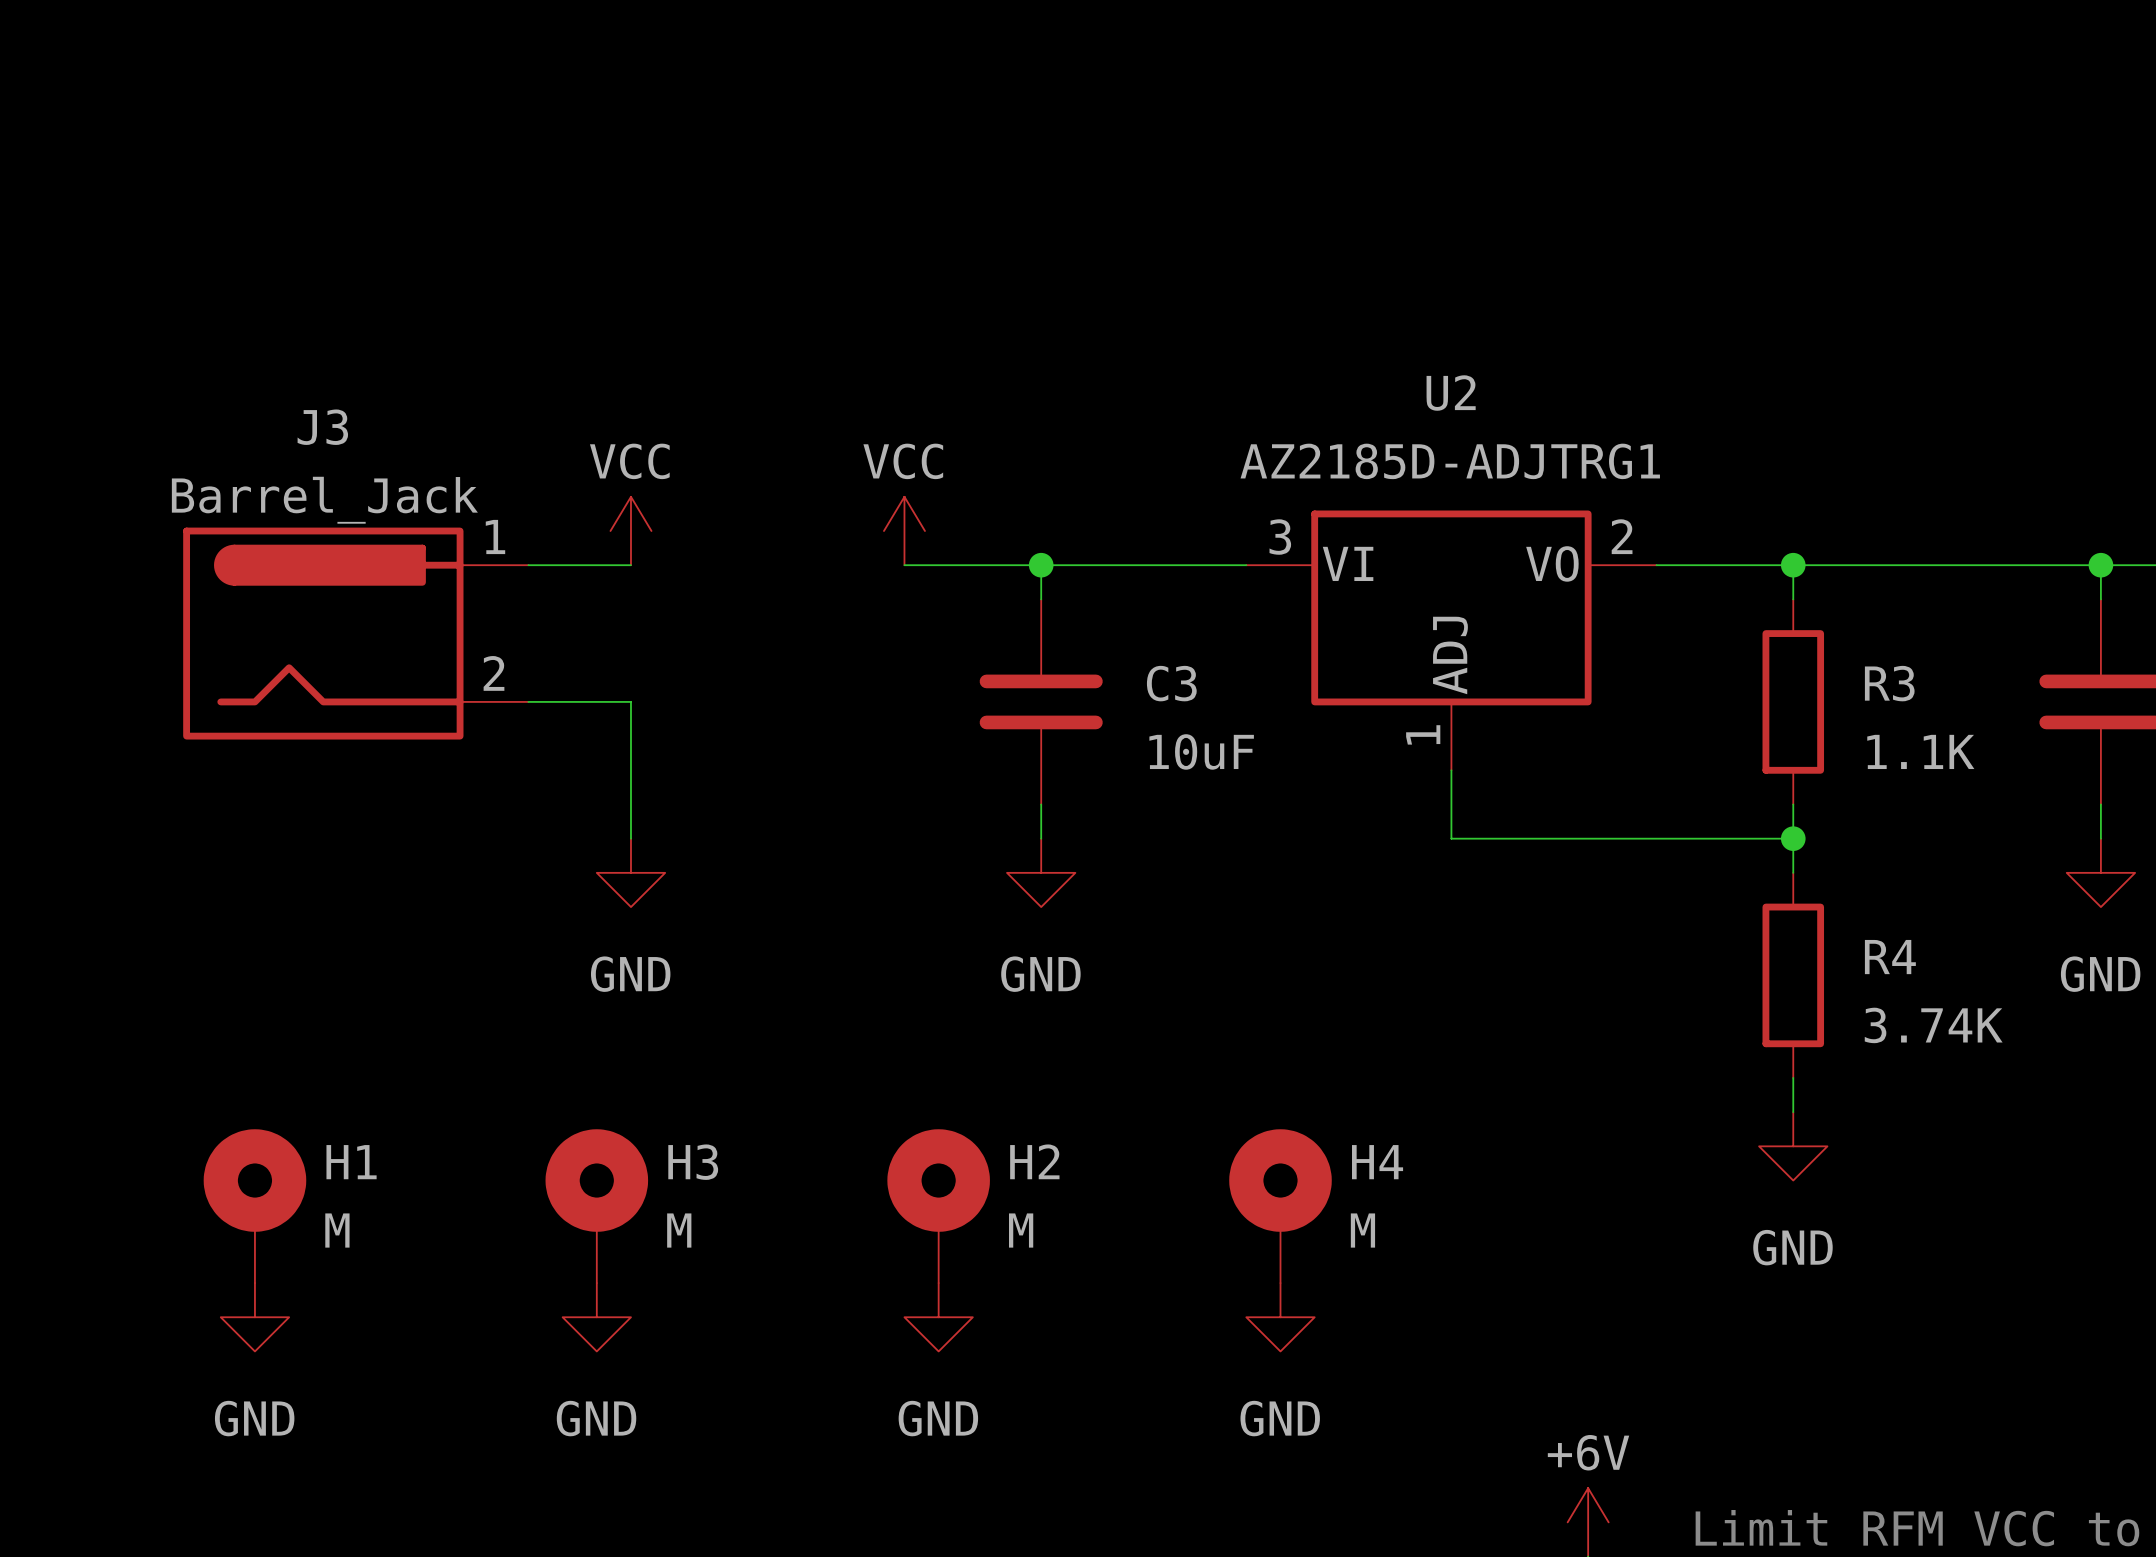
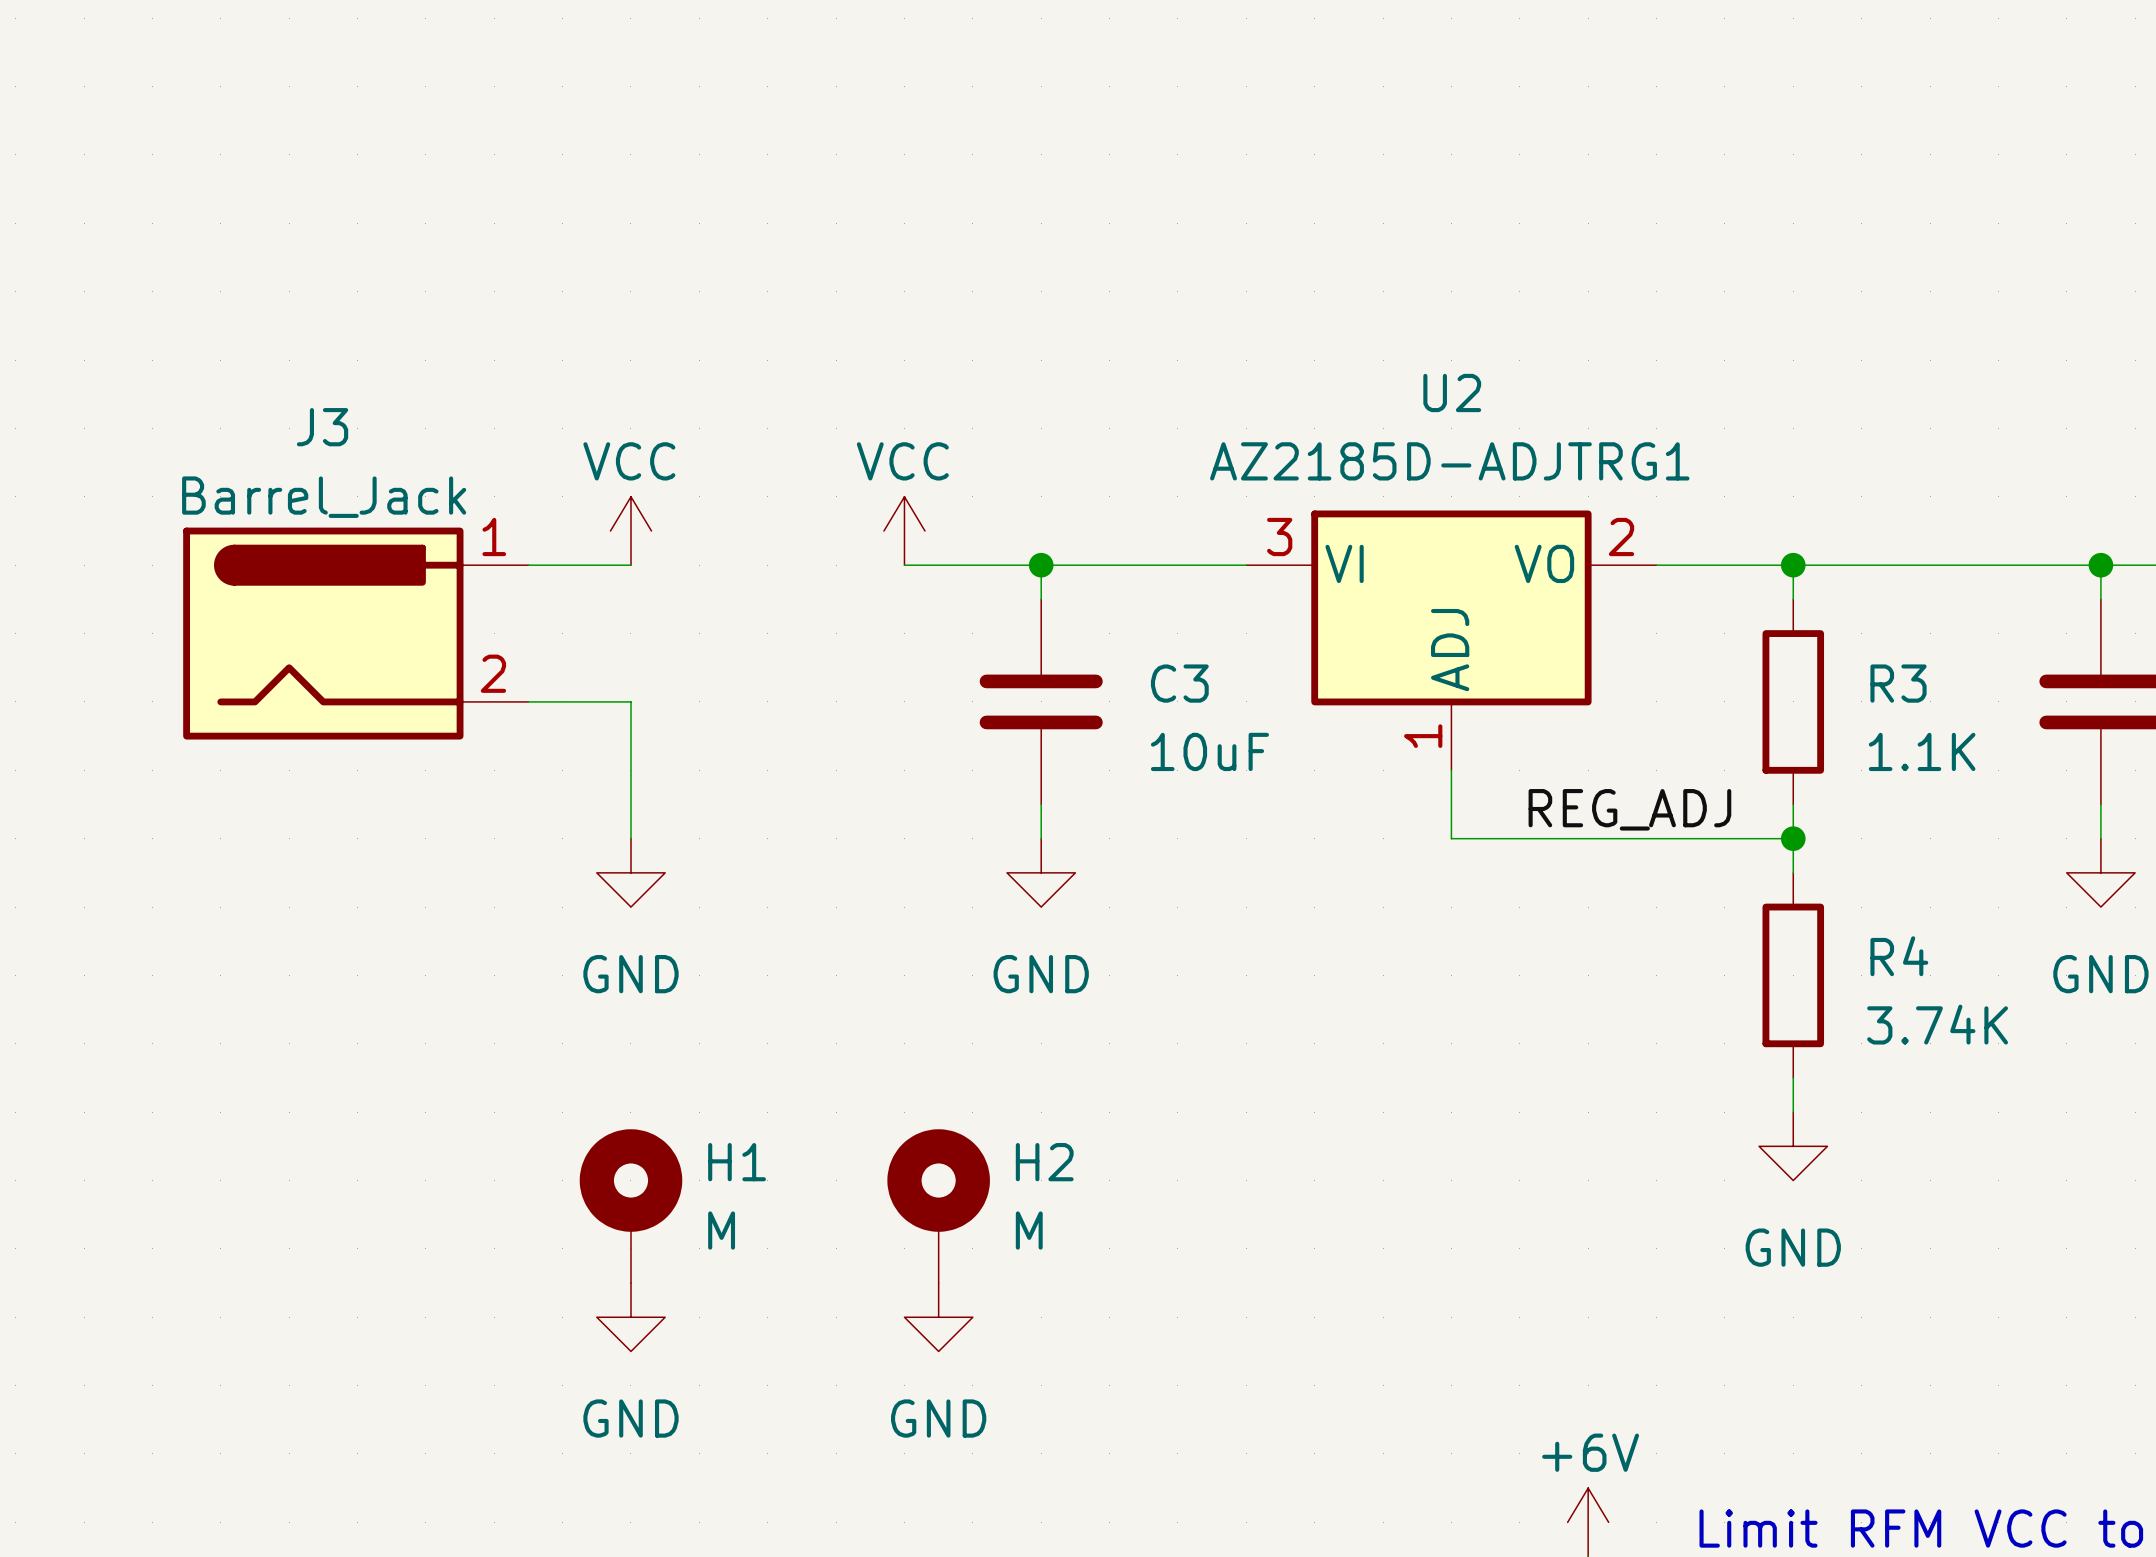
label: none -> REG_ADJ (1629, 809)
H1 position: (254, 1206) -> (630, 1206)
H3: M (596, 1206) -> none
H4: M (1280, 1206) -> none
power symbol: GND (254, 1317) -> none
power symbol position: GND (596, 1317) -> GND (630, 1317)
power symbol: GND (1280, 1317) -> none

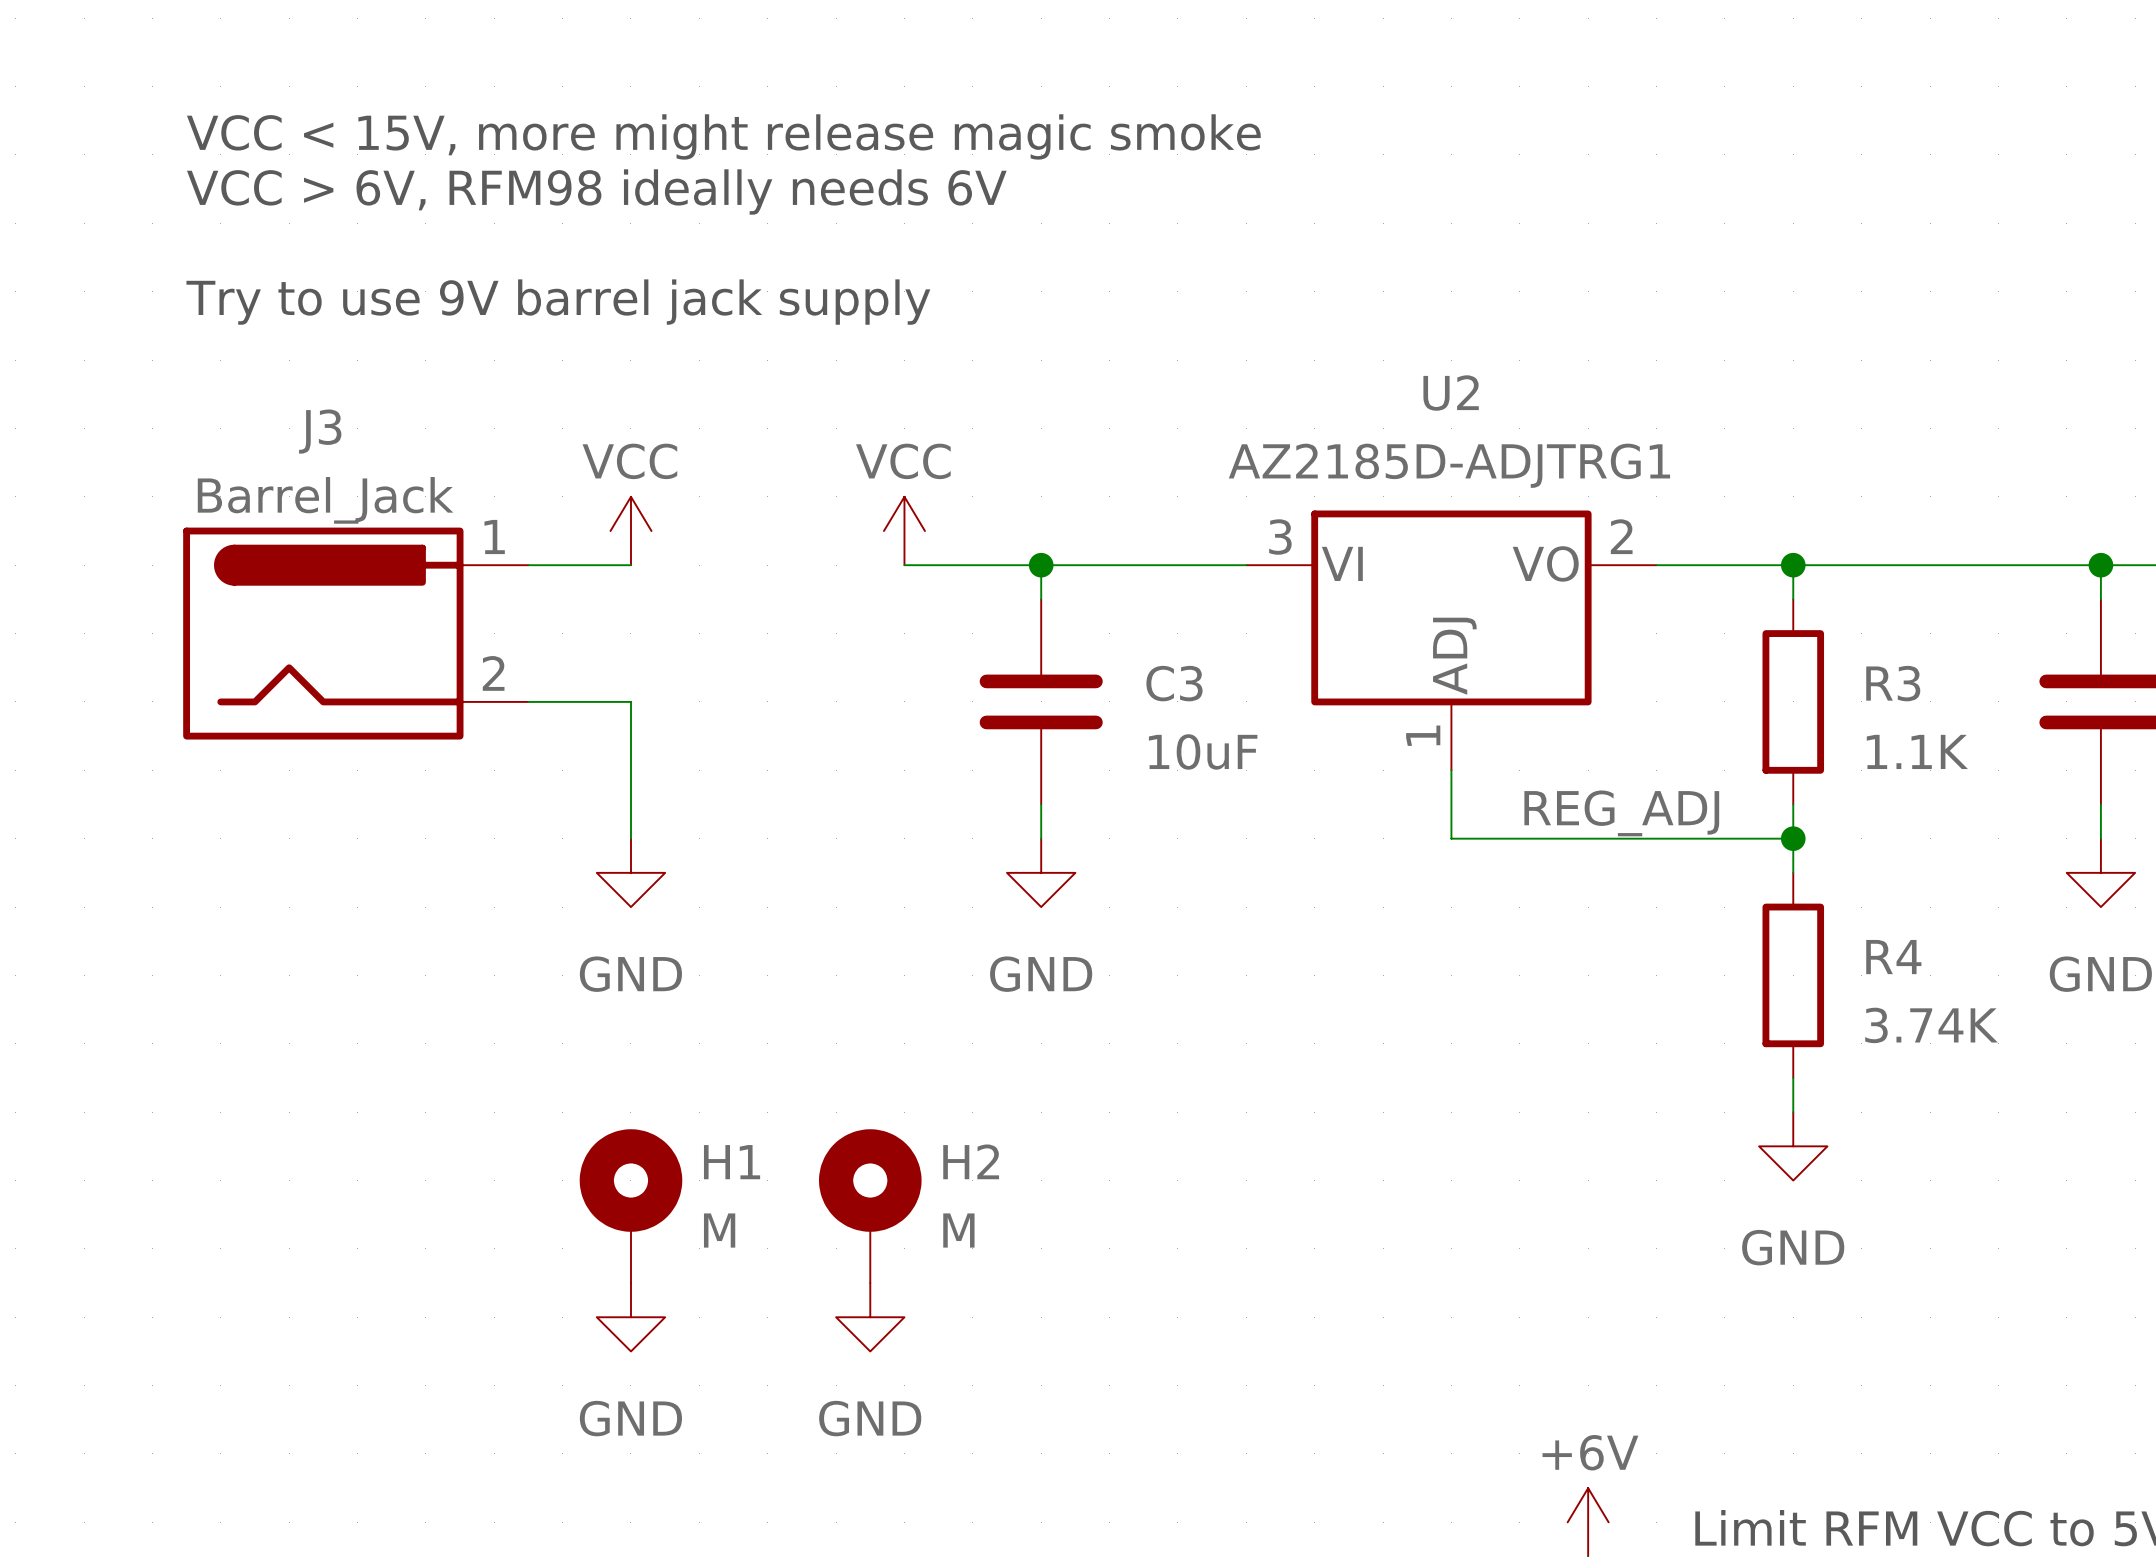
text: none -> VCC < 15V, more might release magic smoke (723, 136)
text: none -> VCC > 6V, RFM98 ideally needs 6V (596, 191)
text: none -> Try to use 9V barrel jack supply (558, 302)
H2 position: (938, 1206) -> (870, 1206)
power symbol position: GND (938, 1317) -> GND (870, 1317)

